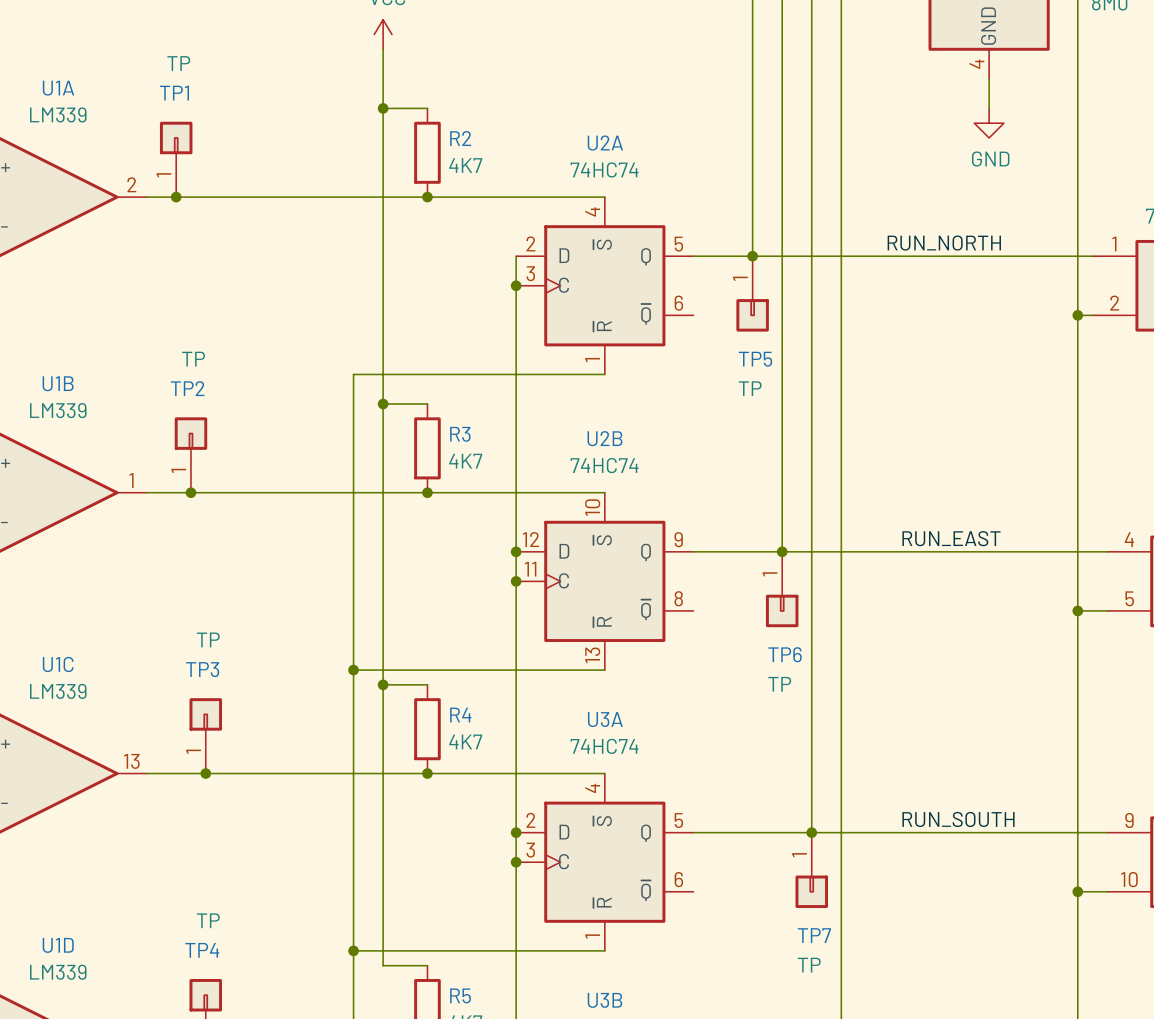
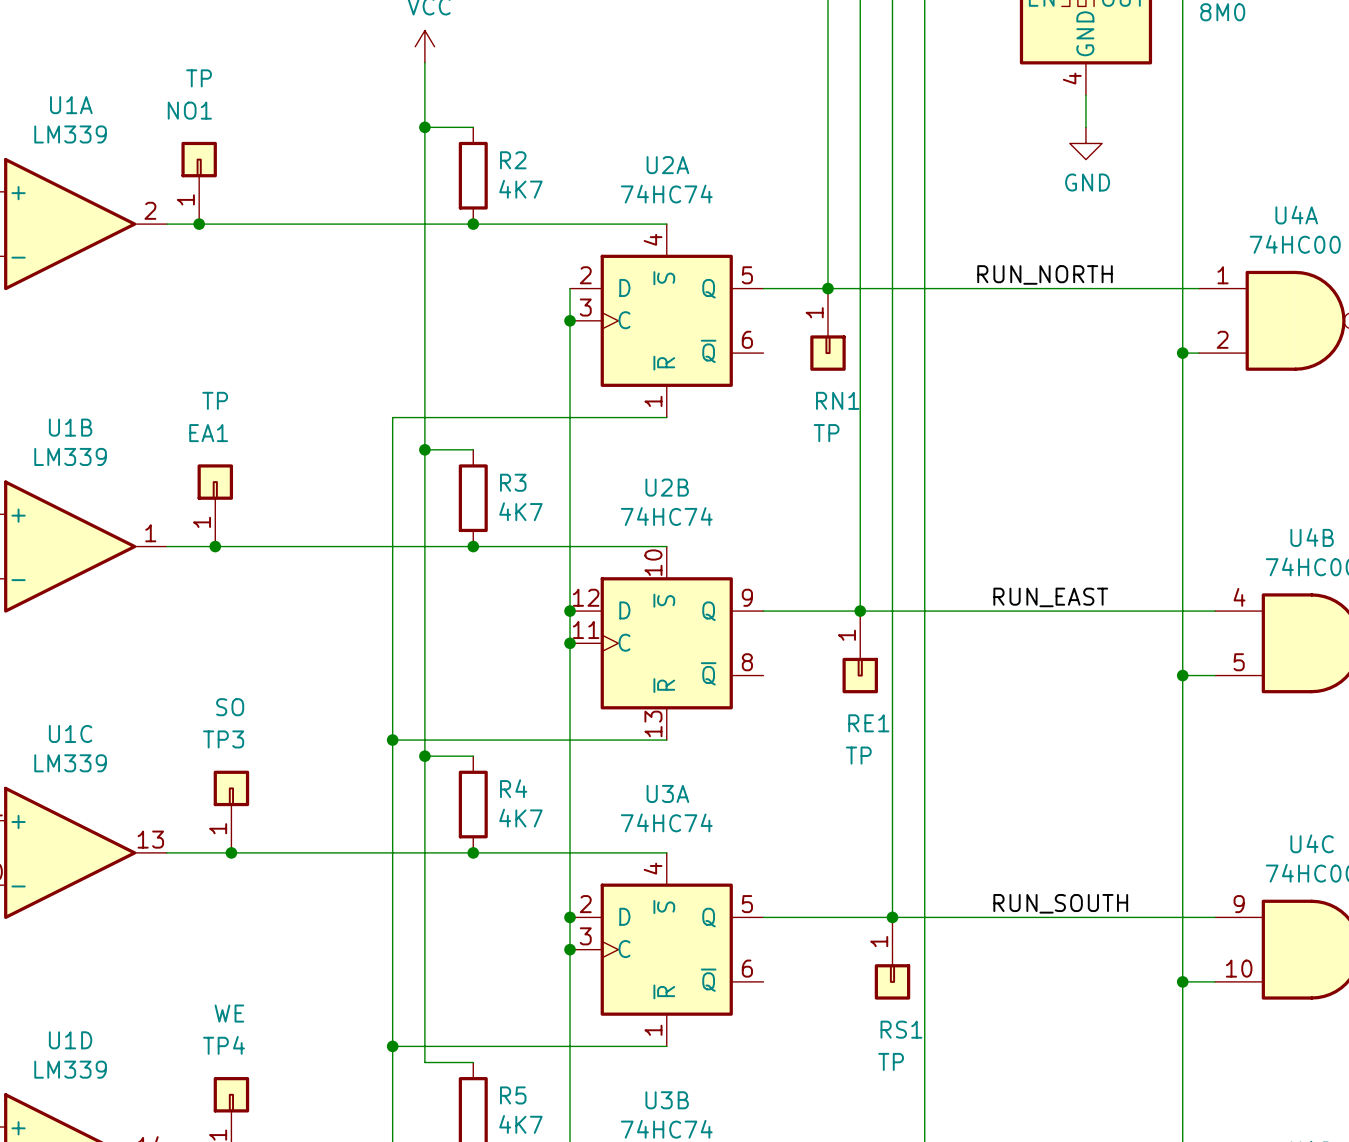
TP1 name: TP1 (174, 93) -> NO1 (189, 110)
TP5 name: TP5 (755, 359) -> RN1 (837, 400)
TP2 name: TP2 (187, 388) -> EA1 (208, 433)
TP3 value: TP (208, 639) -> SO (230, 707)
TP6 name: TP6 (785, 654) -> RE1 (868, 723)
TP4 value: TP (208, 920) -> WE (229, 1013)
TP7 name: TP7 (814, 935) -> RS1 (901, 1029)

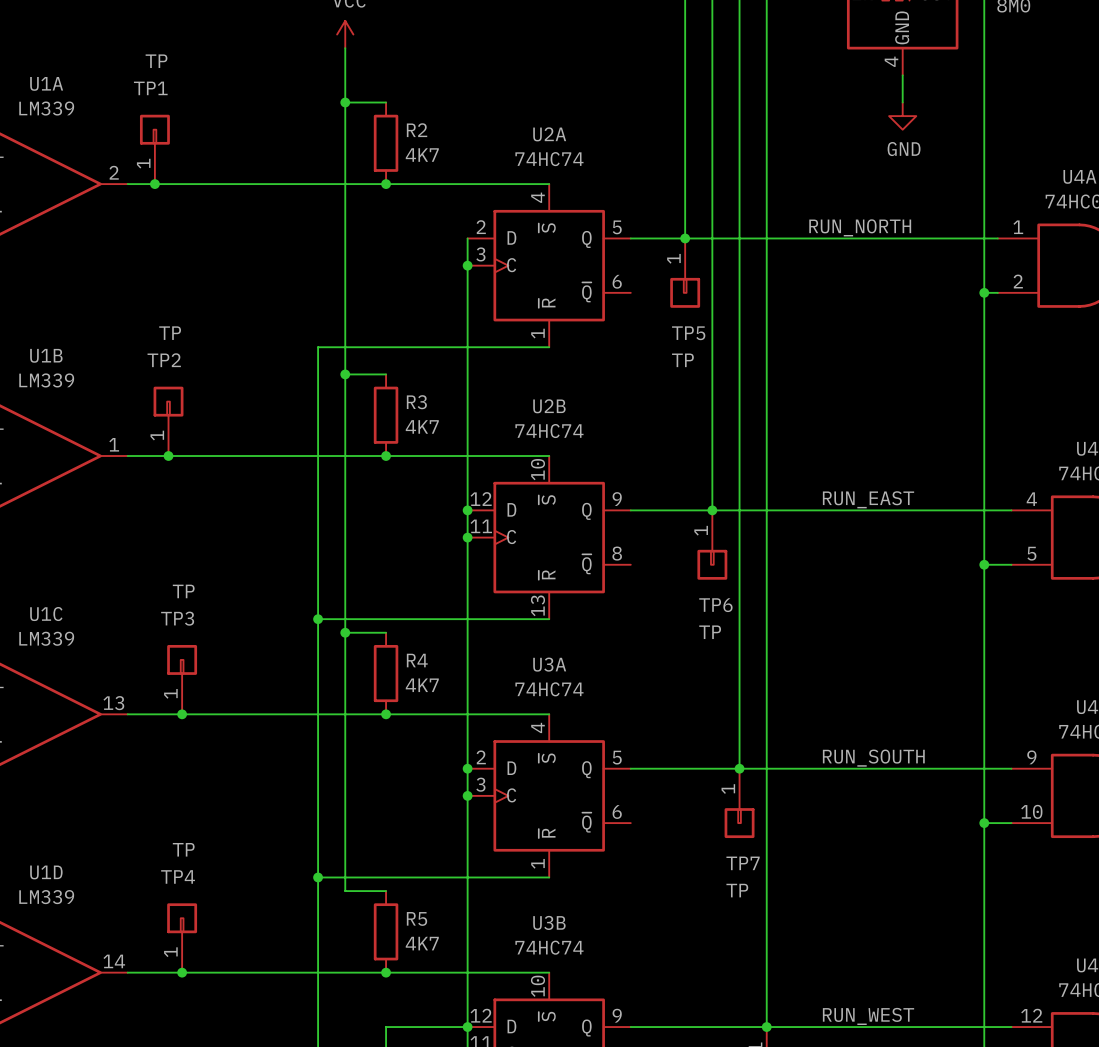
NO1 name: NO1 (189, 110) -> TP1 (150, 88)
RN1 name: RN1 (837, 400) -> TP5 (688, 333)
EA1 name: EA1 (208, 433) -> TP2 (164, 360)
TP3 value: SO (230, 707) -> TP (183, 591)
RE1 name: RE1 (868, 723) -> TP6 (715, 605)
TP4 value: WE (229, 1013) -> TP (183, 849)
RS1 name: RS1 (901, 1029) -> TP7 (743, 863)

